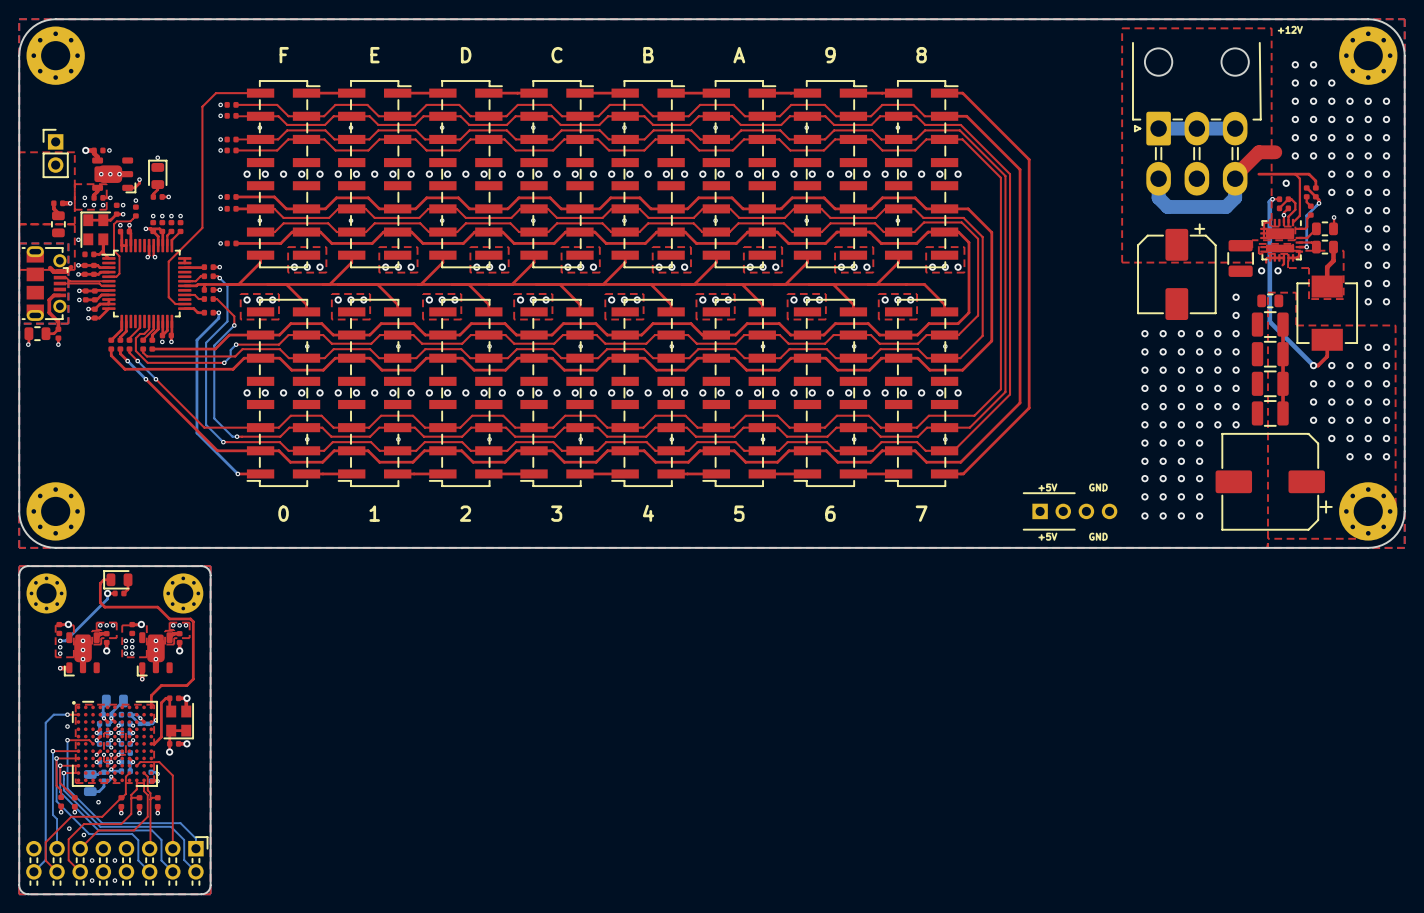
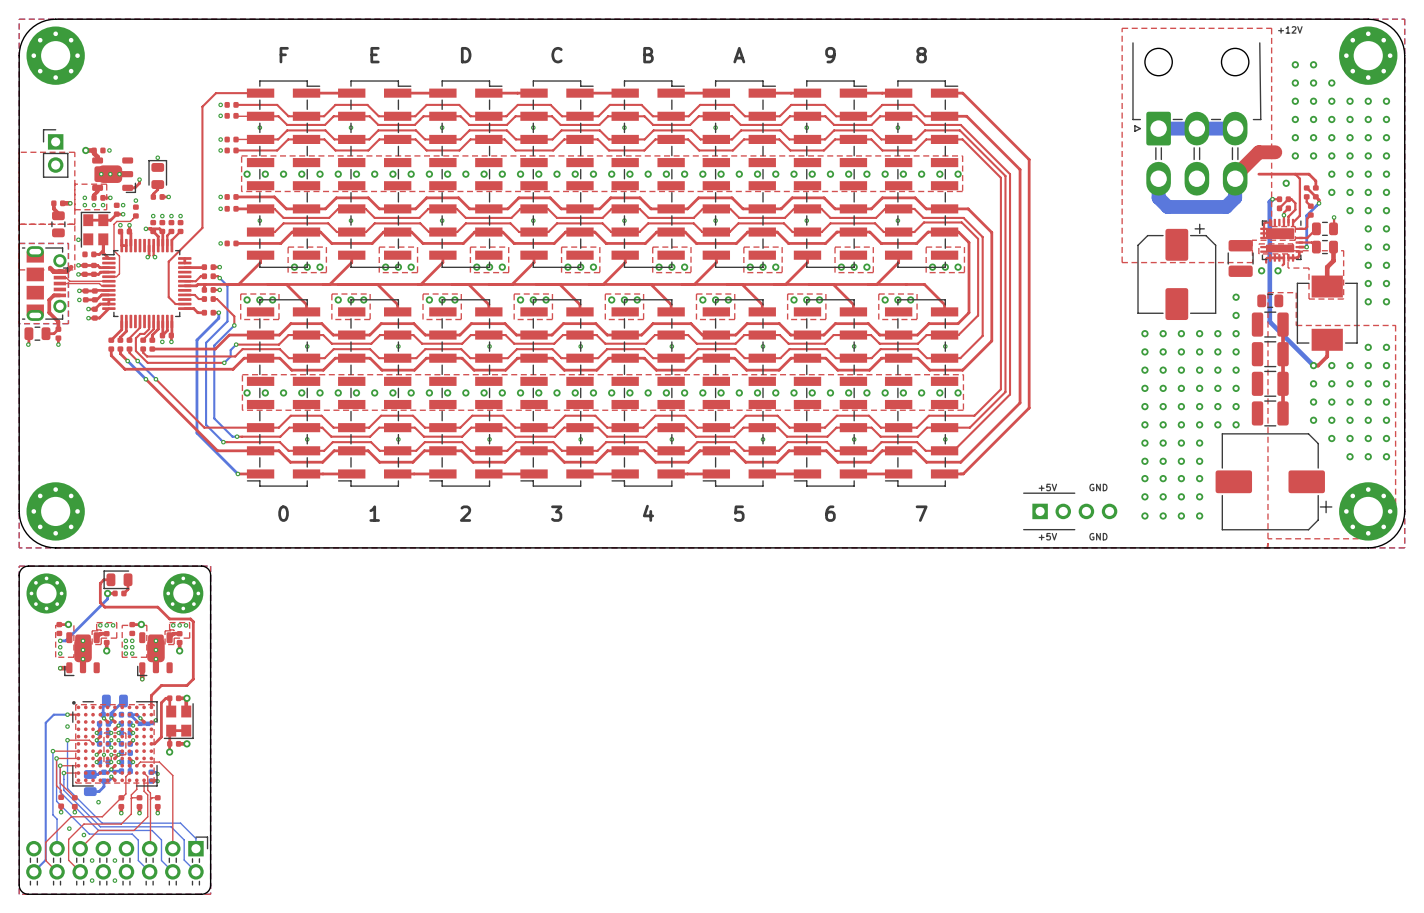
top zone outline: none -> (241, 155) (962, 155) (962, 191) (241, 191) (241, 155)
top zone outline: none -> (242, 374) (963, 374) (963, 410) (242, 410) (242, 374)

